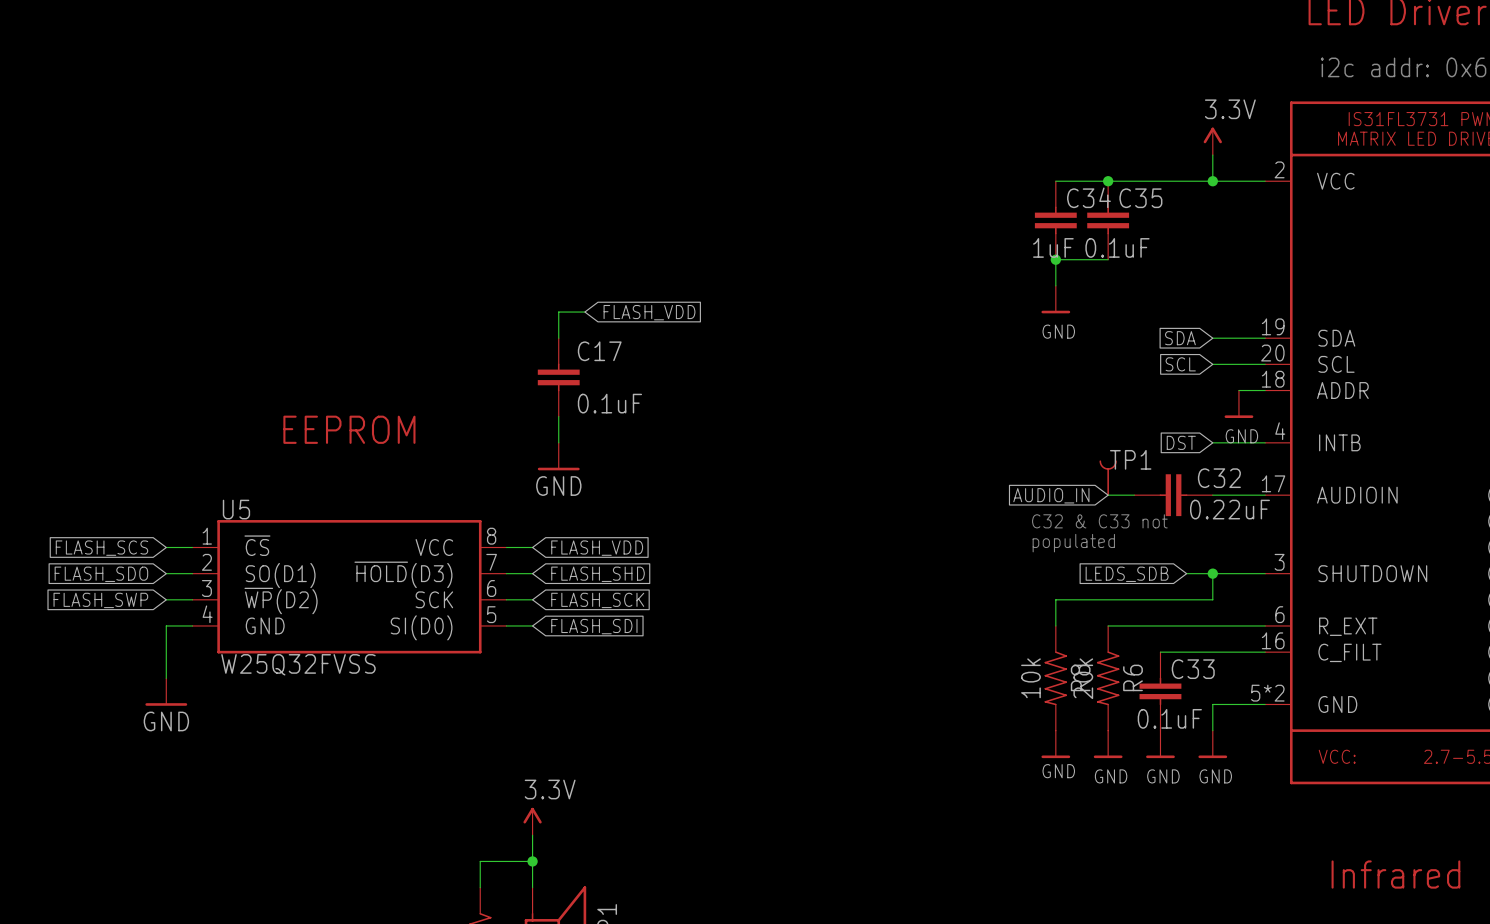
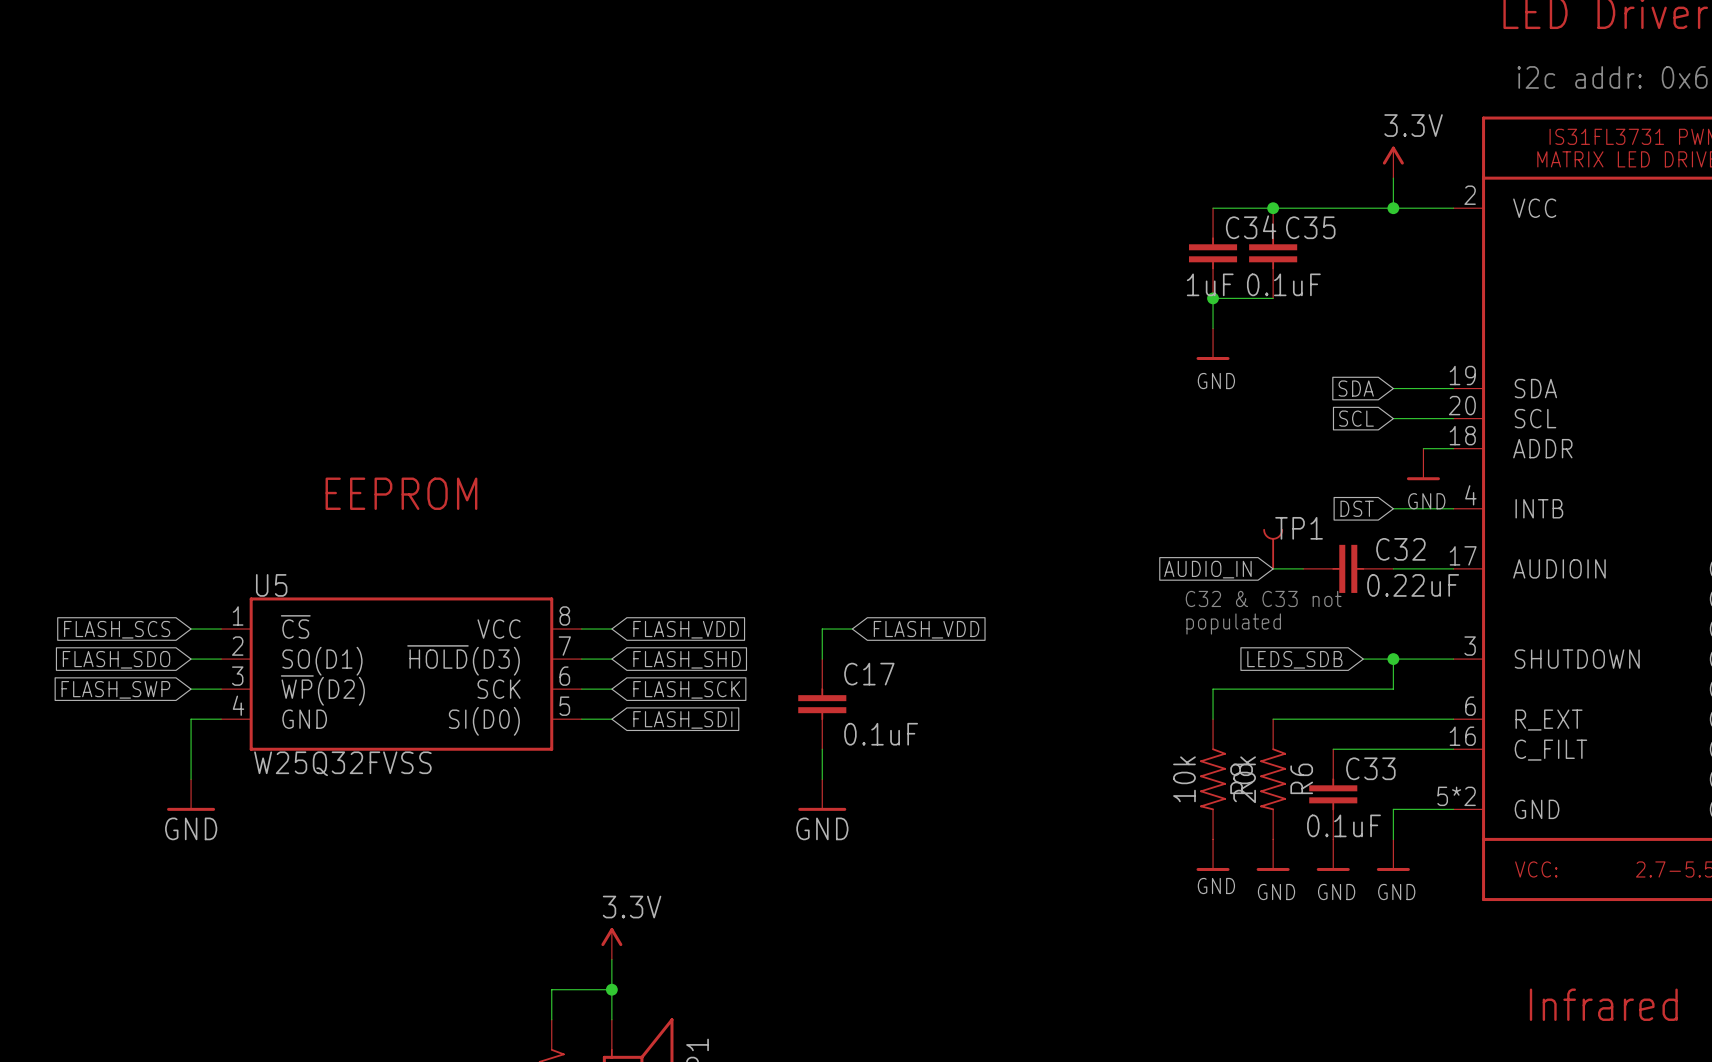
wire: (584, 312) (558, 312) (558, 338) -> none
global label: FLASH_VDD (649, 312) -> none
C17 position: (558, 377) -> (822, 704)
wire: (558, 416) (558, 442) -> none
power symbol: GND (558, 456) -> none
wire: none -> (852, 629) (822, 629) (822, 659)
global label: none -> FLASH_VDD (926, 629)
wire: none -> (822, 749) (822, 779)
power symbol: none -> GND (822, 795)

